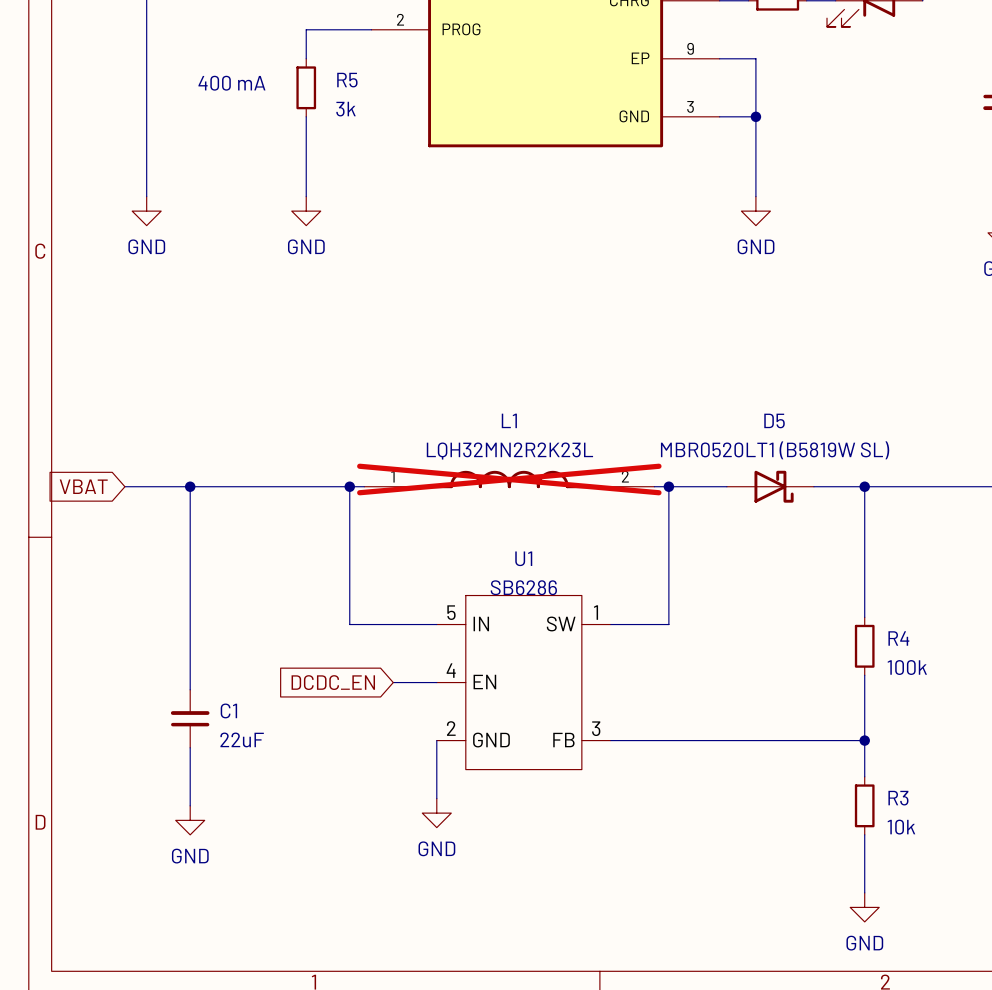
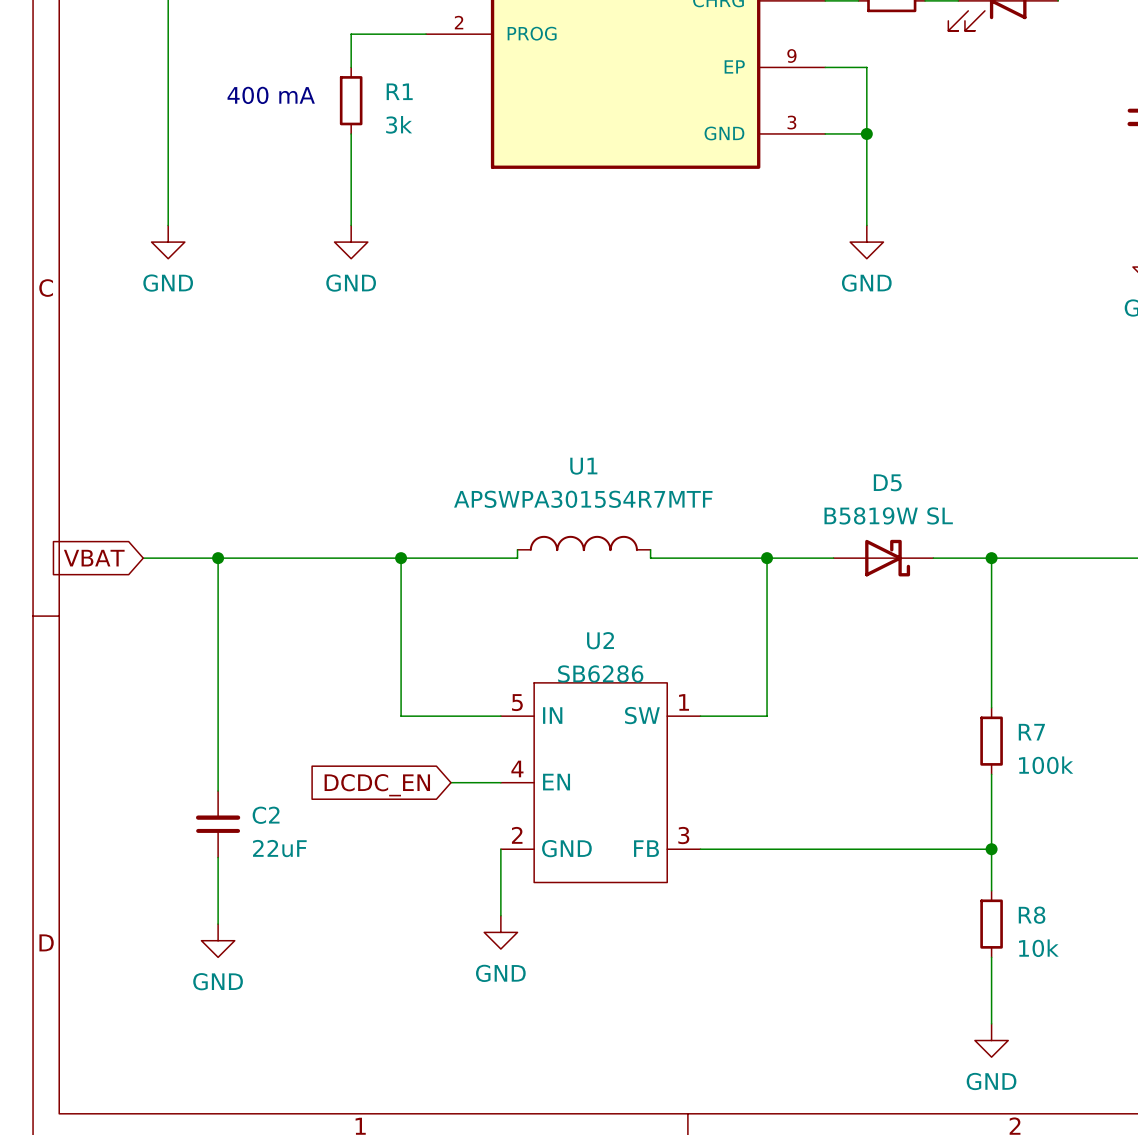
R5 name: R5 (347, 80) -> R1 (399, 91)
D5 value: MBR0520LT1 (B5819W SL) (775, 450) -> B5819W SL (888, 515)
U1: none -> APSWPA3015S4R7MTF (584, 543)
L1: LQH32MN2R2K23L (509, 479) -> none
U1 name: U1 (523, 558) -> U2 (600, 640)
R4 name: R4 (898, 638) -> R7 (1031, 732)
C1 name: C1 (228, 710) -> C2 (266, 815)
R3 name: R3 (898, 798) -> R8 (1032, 915)

